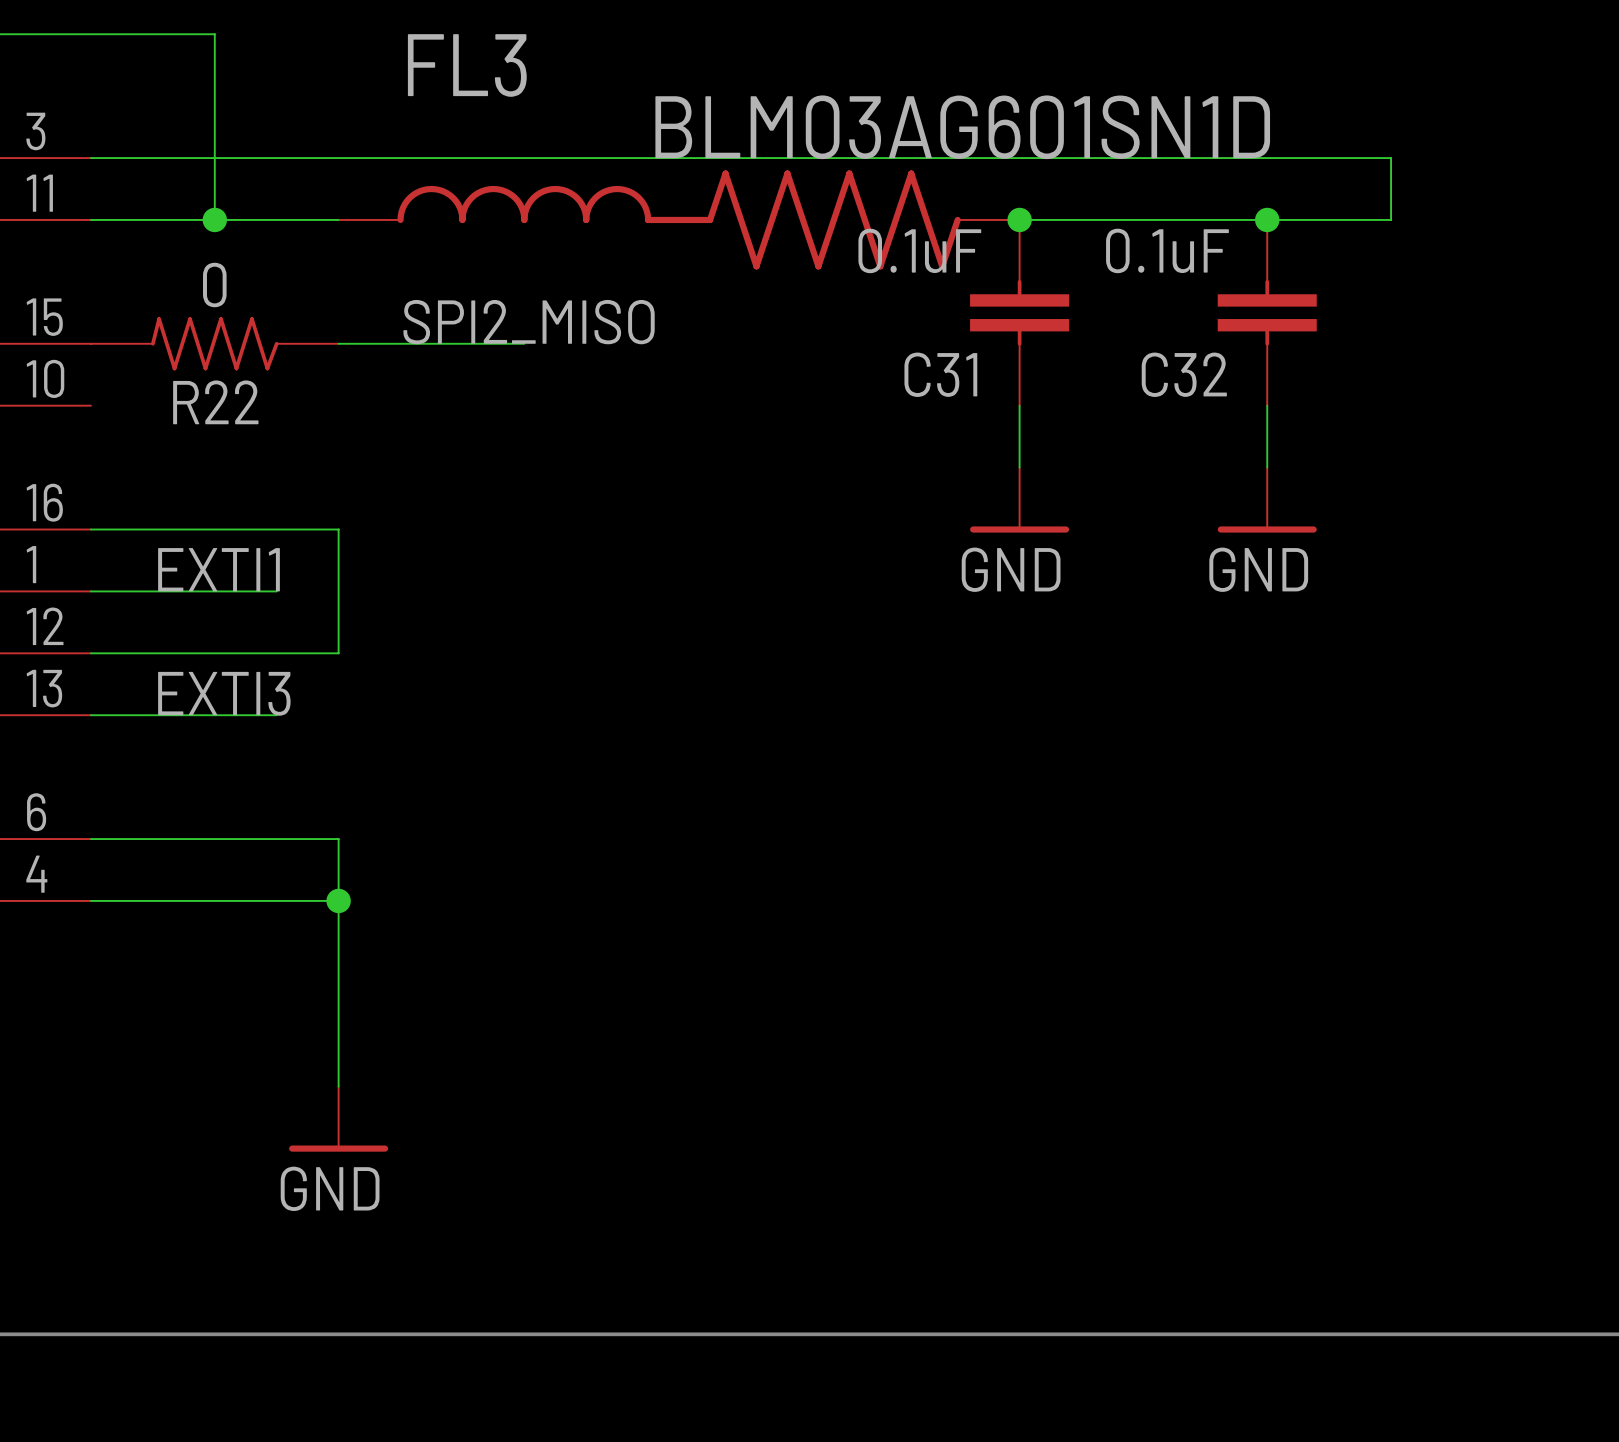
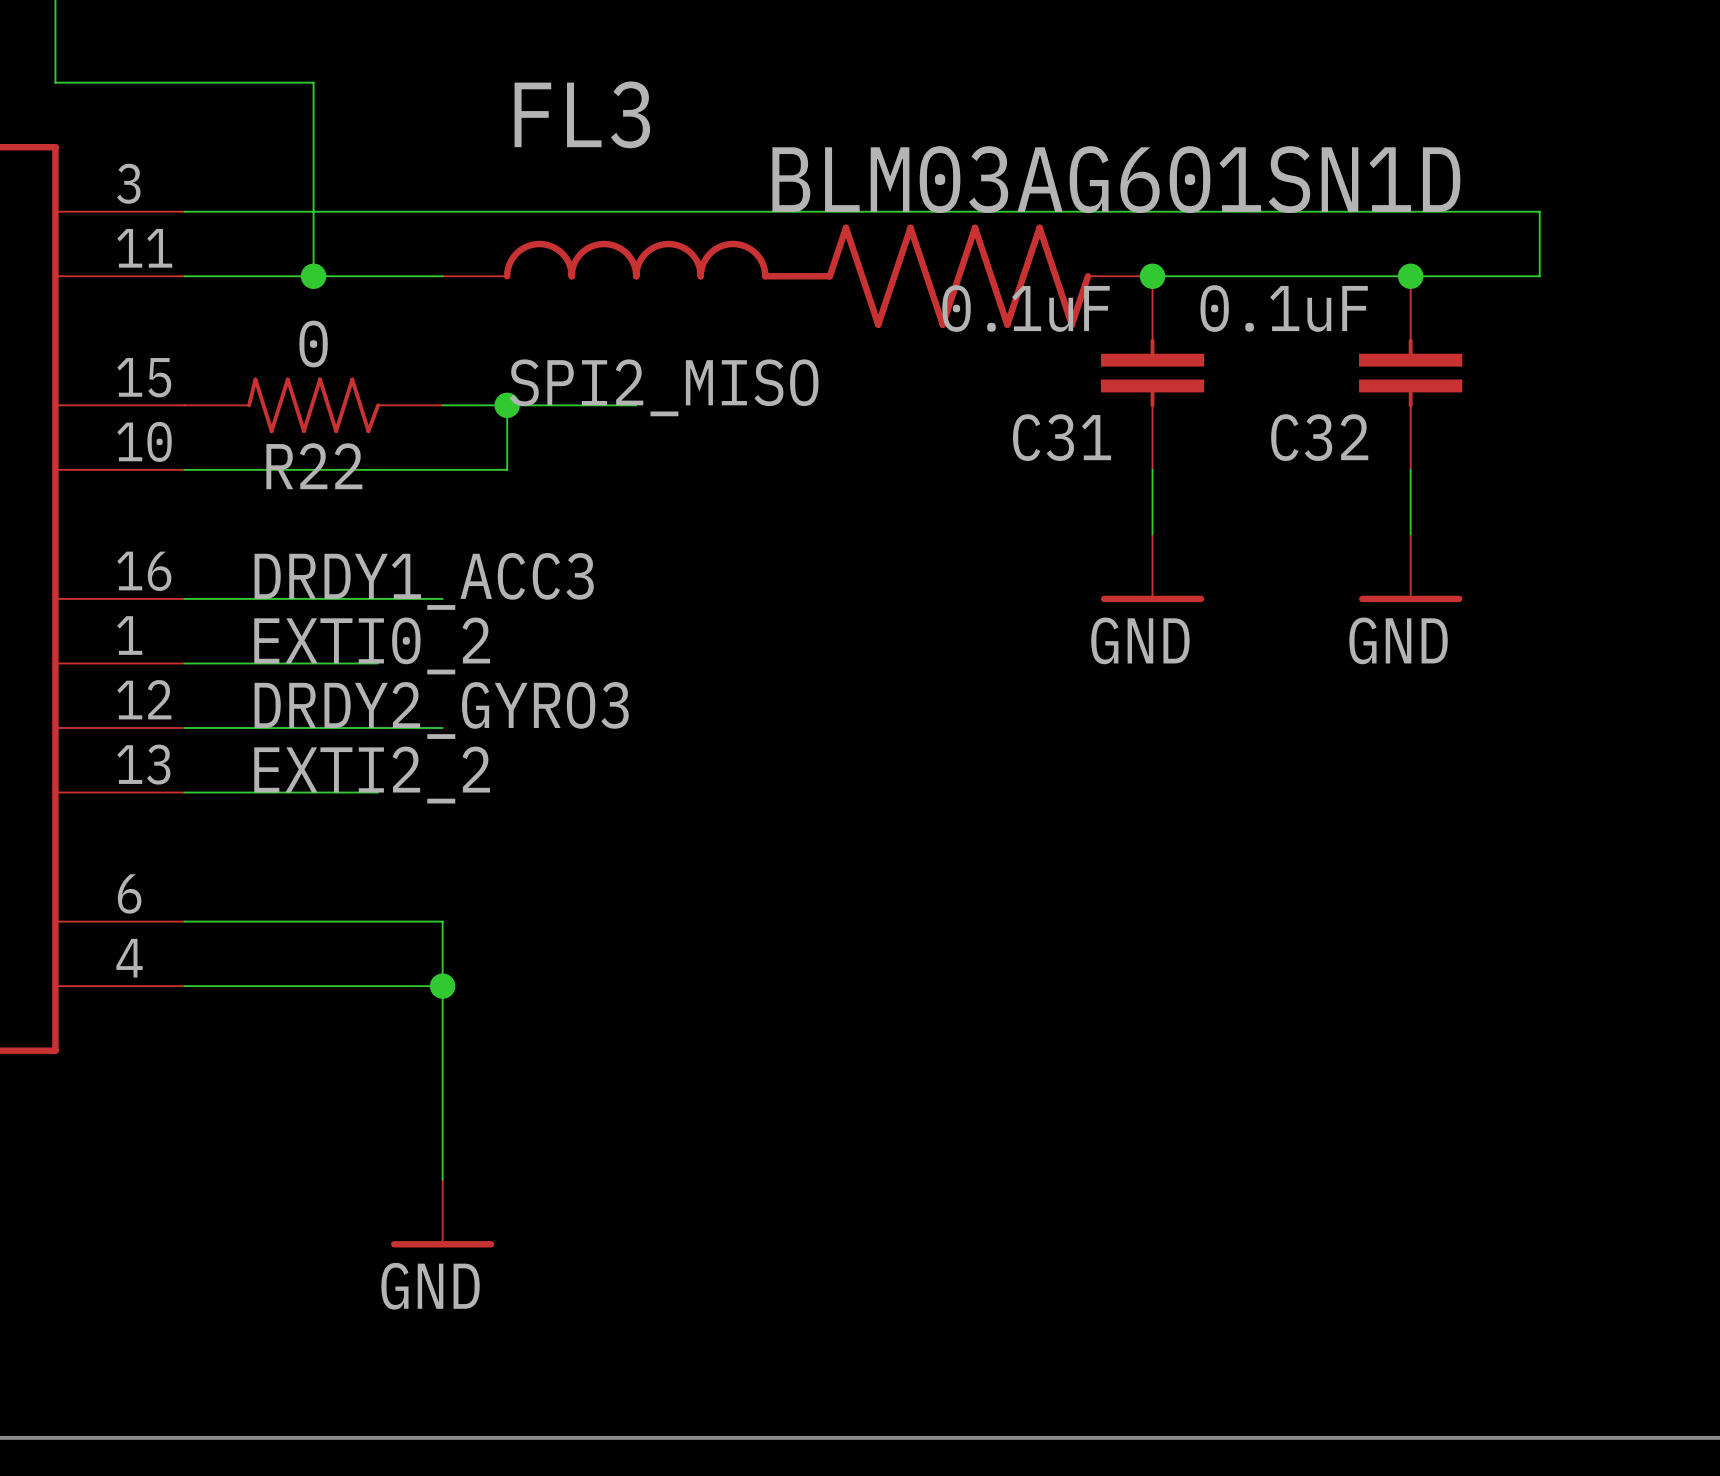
wire: none -> (507, 405) (507, 469) (184, 469)
junction: none -> (507, 405)
label: none -> DRDY1_ACC3 (424, 581)
wire: (338, 529) (338, 653) -> none
label: EXTI1 (219, 569) -> EXTI0_2 (372, 645)
label: none -> DRDY2_GYRO3 (441, 710)
label: EXTI3 (224, 693) -> EXTI2_2 (372, 775)

